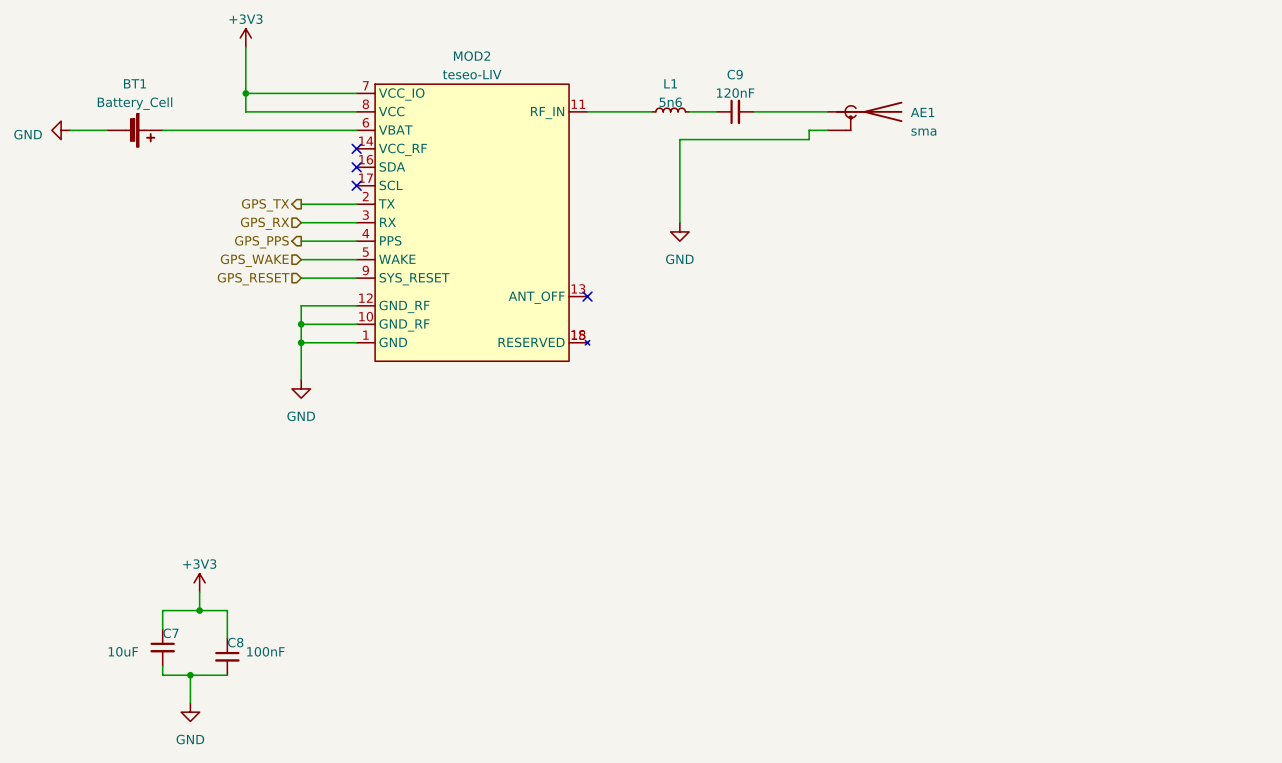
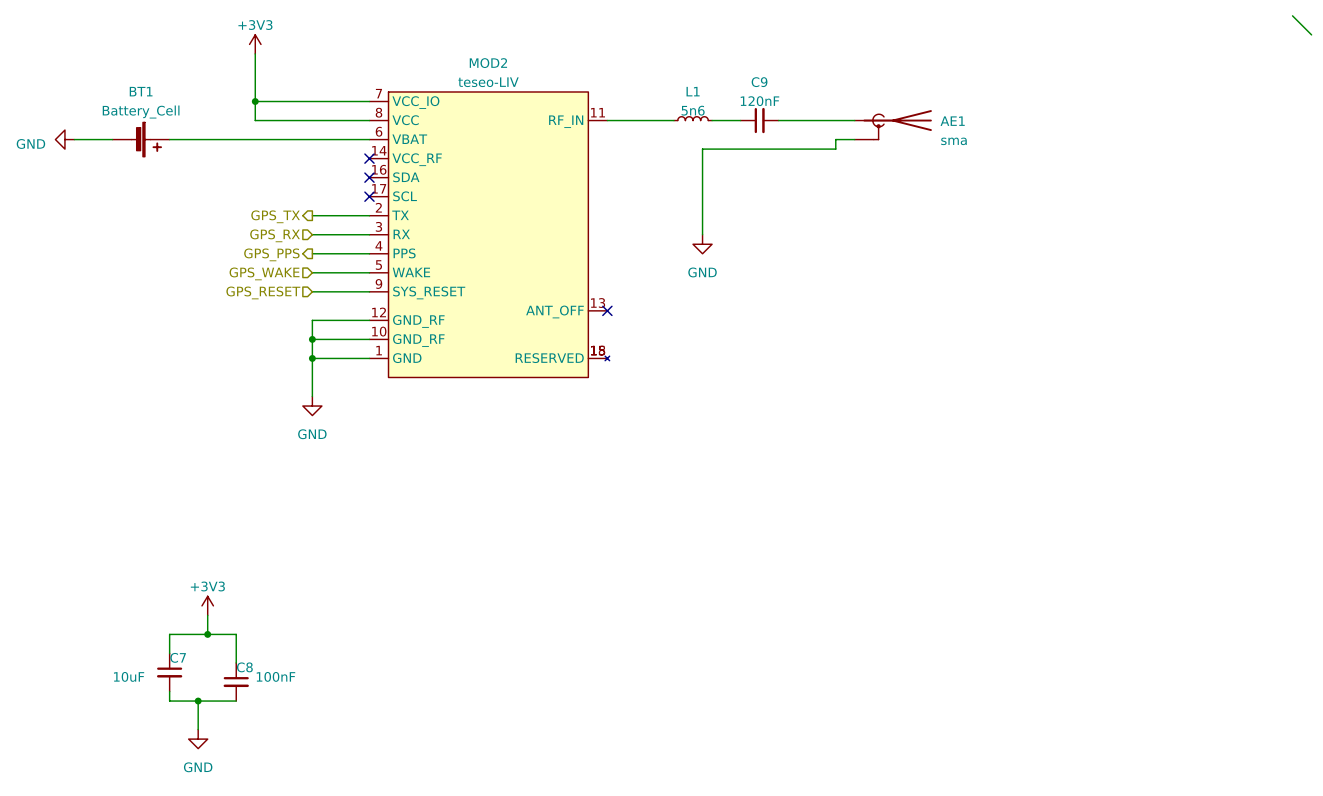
wire: none -> (1292, 15) (1311, 34)

